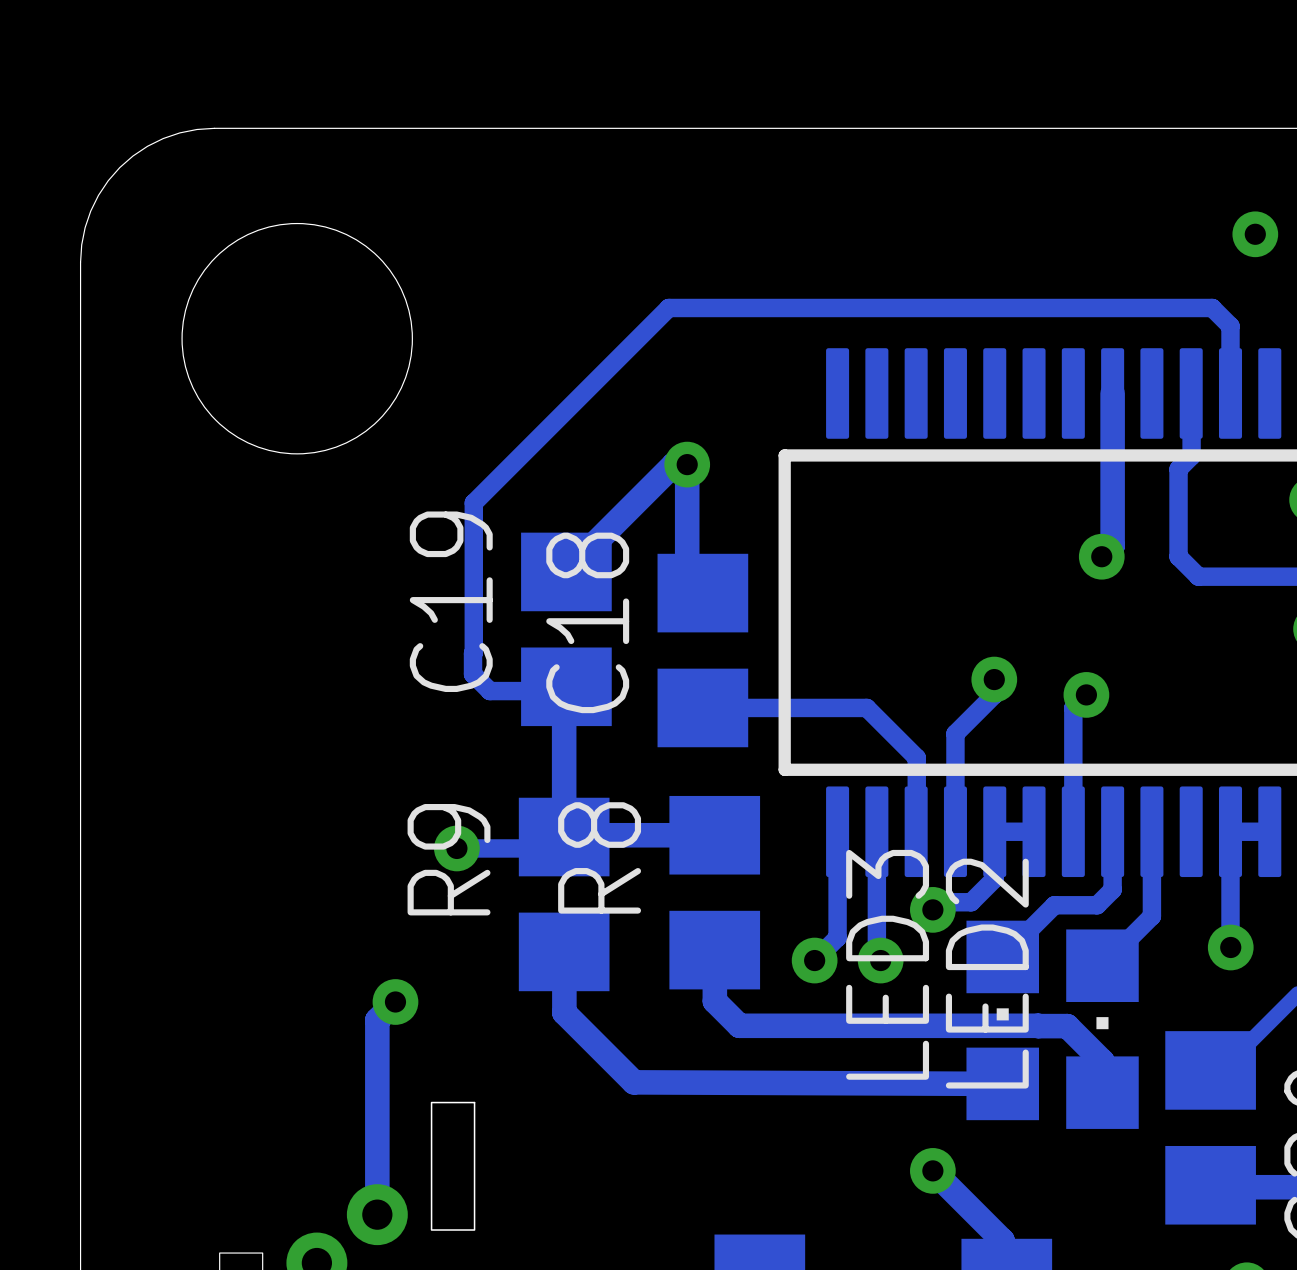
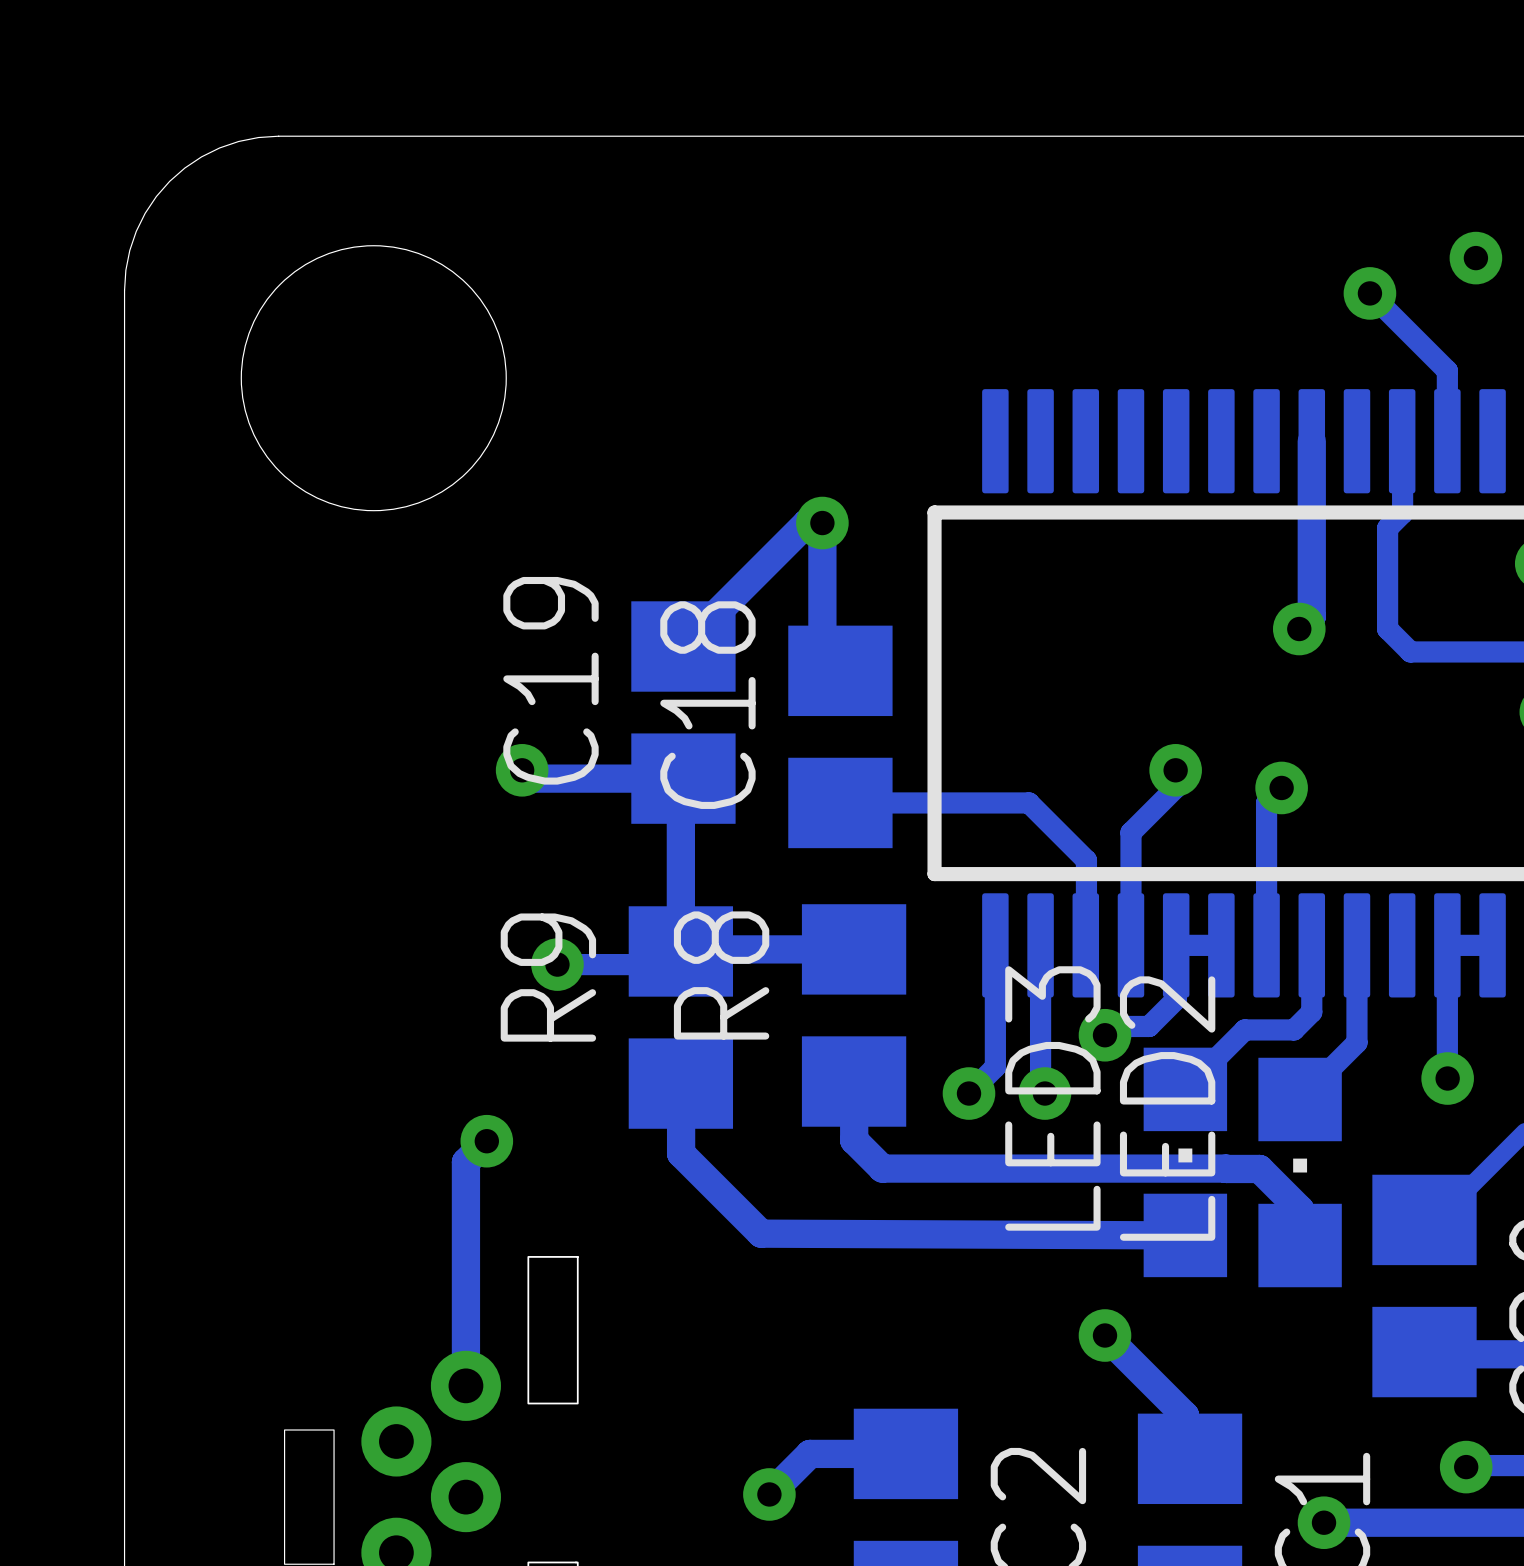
via: none -> (1369, 293)
track: (1230, 332) (1230, 326) (1212, 307) (668, 307) (473, 502) (473, 652) -> (1447, 370) (1369, 293)
track: (473, 653) (473, 674) (489, 691) (562, 691) -> none
track: none -> (522, 770) (530, 778) (683, 778)
via: none -> (522, 770)

